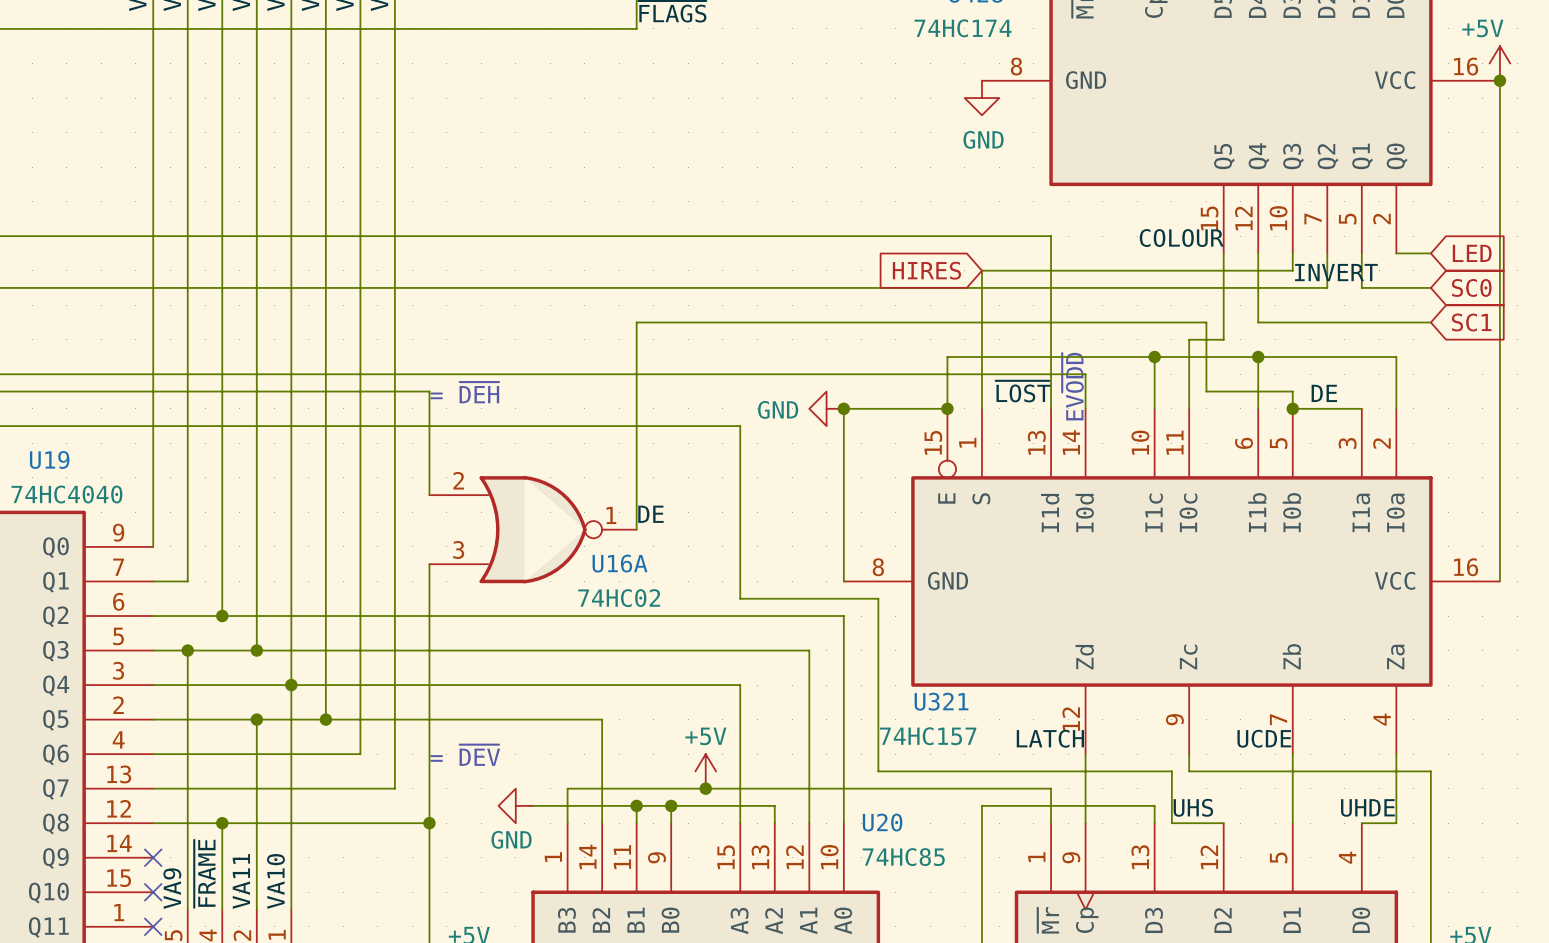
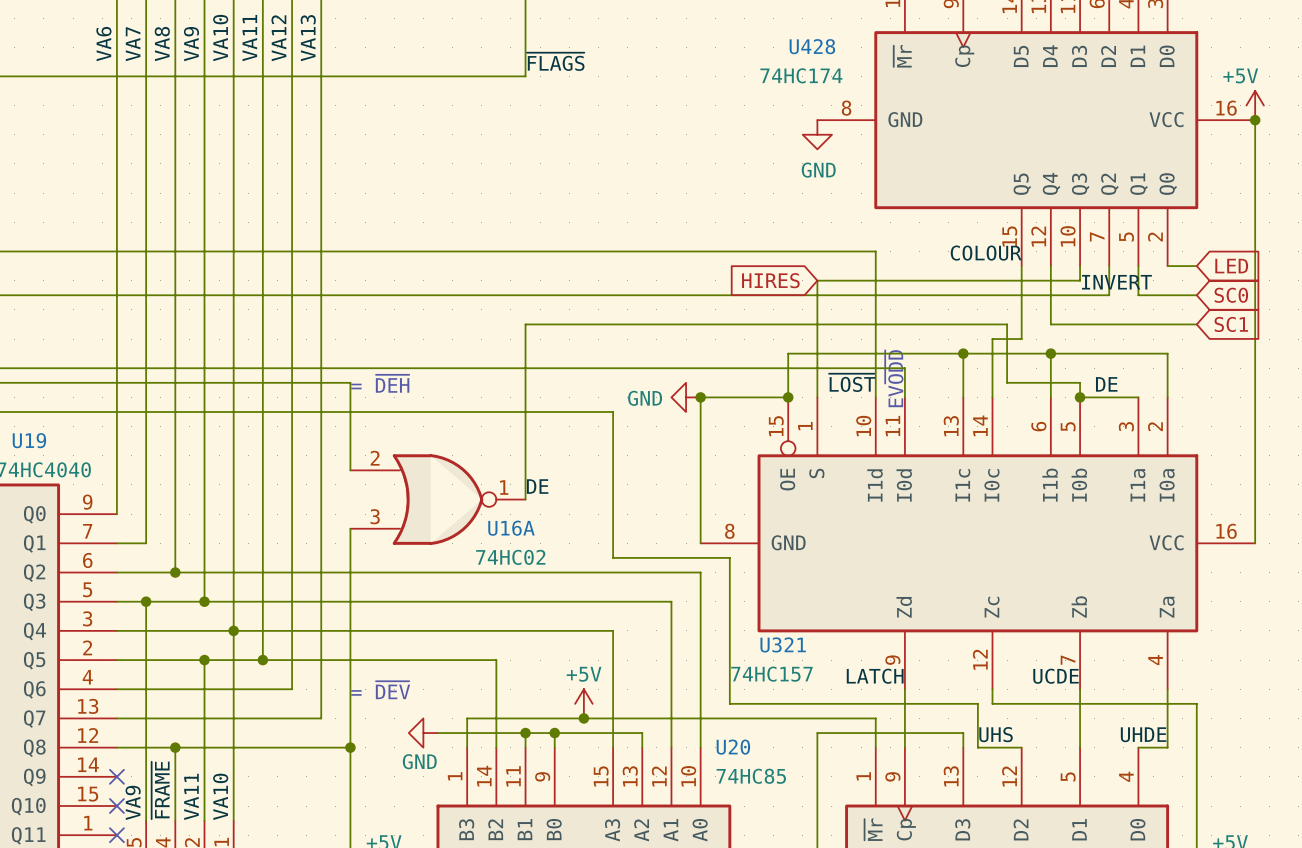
U321 pin number: 13 (1036, 442) -> 10 (863, 426)
U321 pin number: 14 (1071, 442) -> 11 (892, 426)
U321 pin number: 10 (1140, 442) -> 13 (951, 426)
U321 pin number: 11 (1174, 442) -> 14 (980, 425)
U321 pin name: E (946, 498) -> OE (787, 479)
U321 pin number: 12 (1071, 719) -> 9 (892, 660)
U321 pin number: 9 (1174, 719) -> 12 (980, 659)

